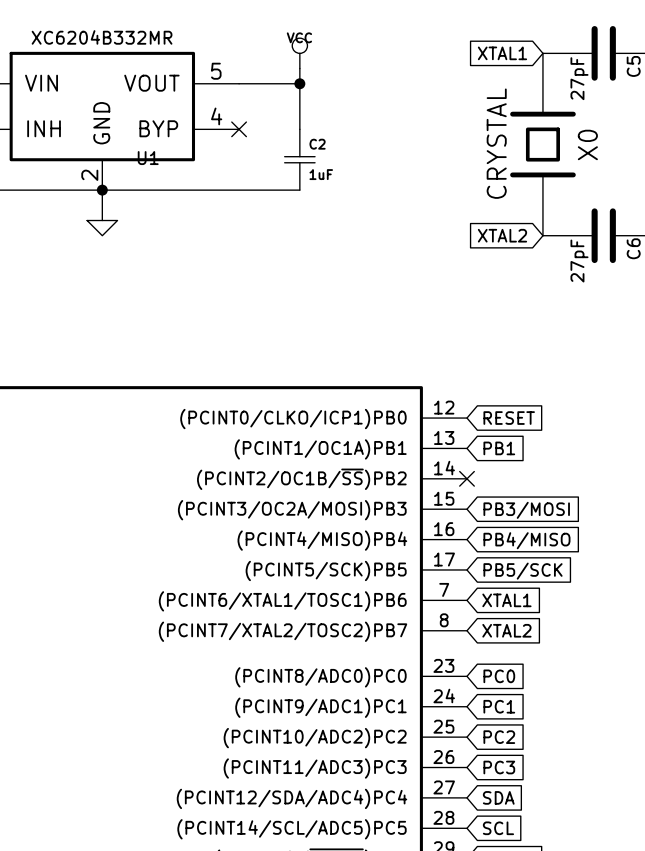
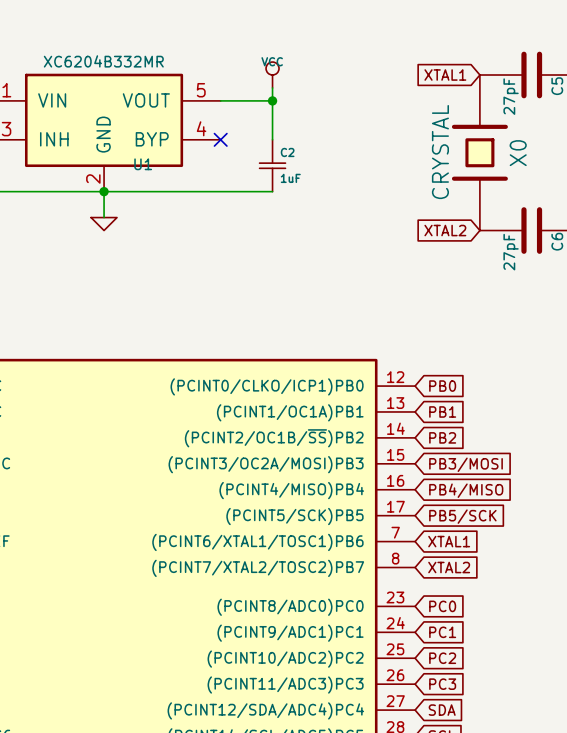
global label: RESET (509, 418) -> PB0 (442, 386)
no-connect mark: (466, 478) -> none
global label: none -> PB2 (442, 437)

